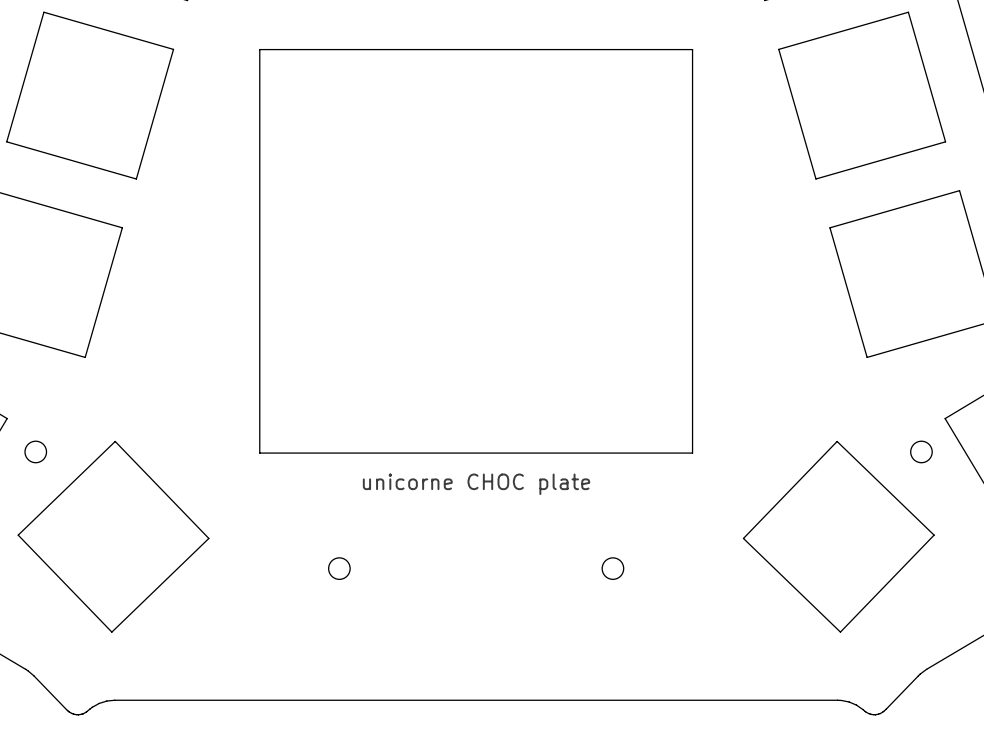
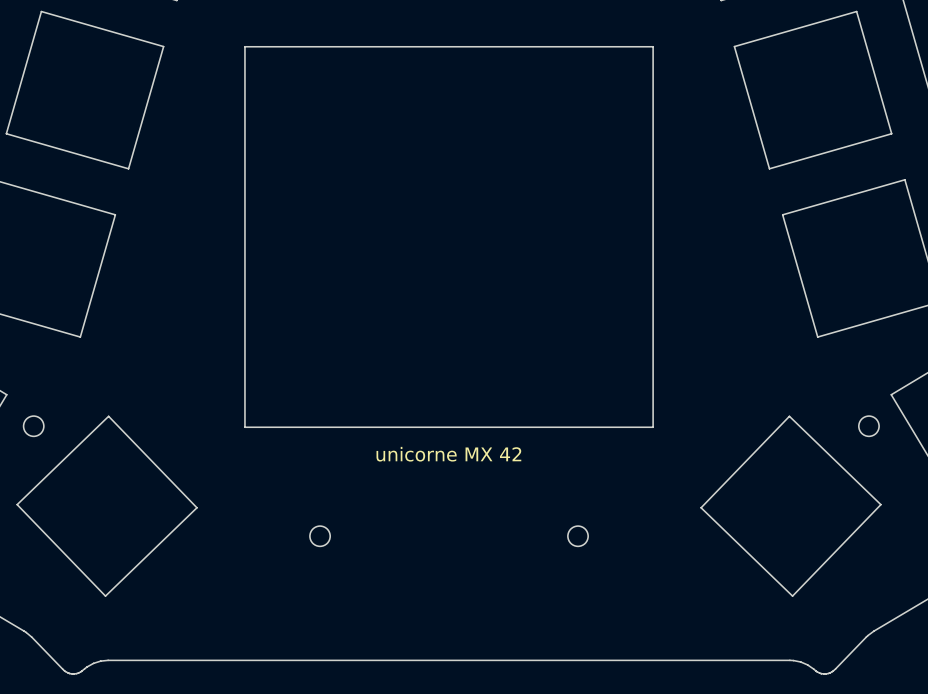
text: unicorne CHOC plate (476, 484) -> unicorne MX 42 (448, 454)

